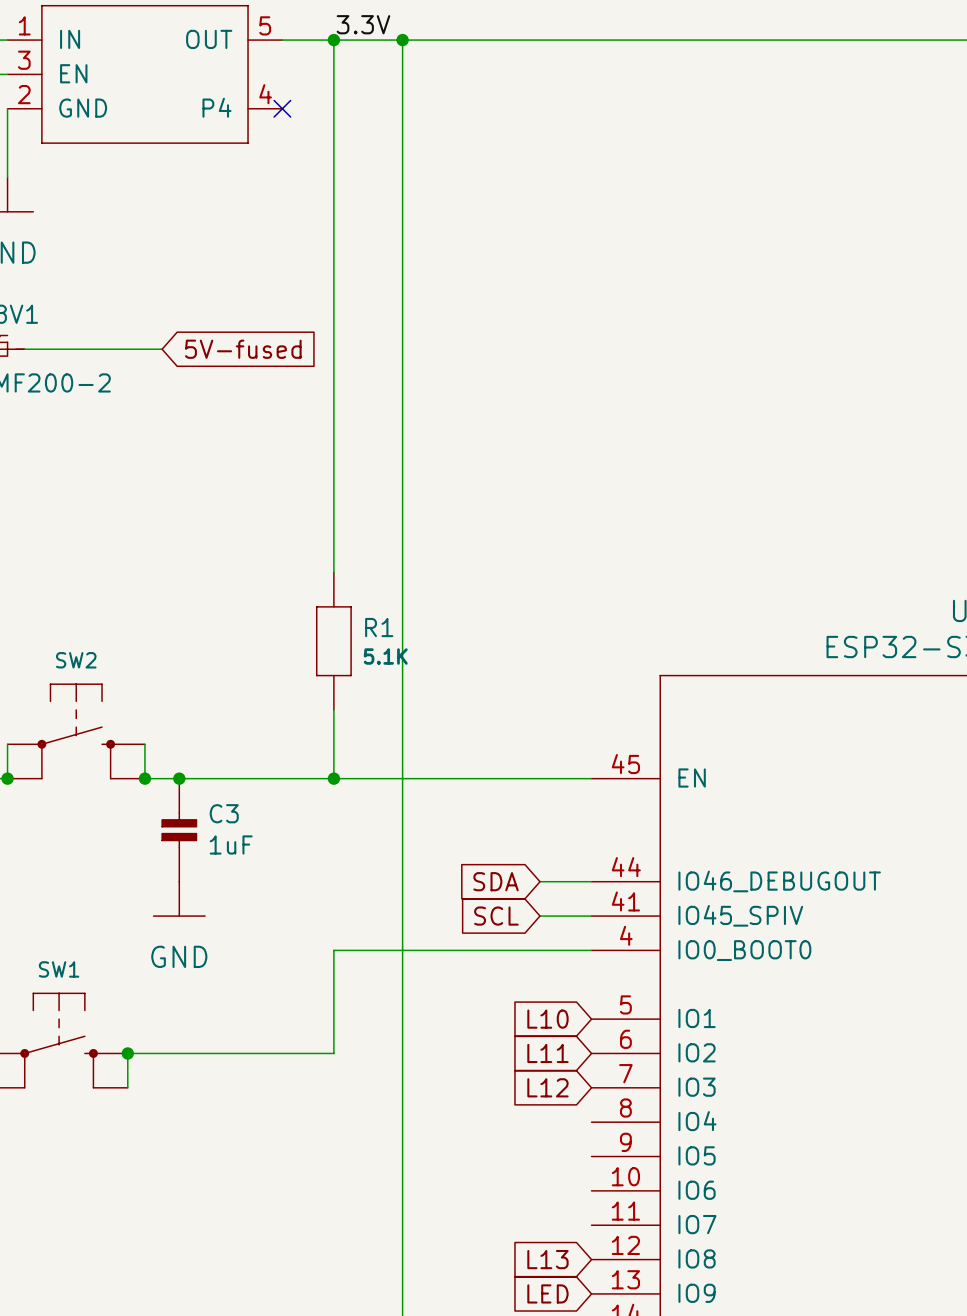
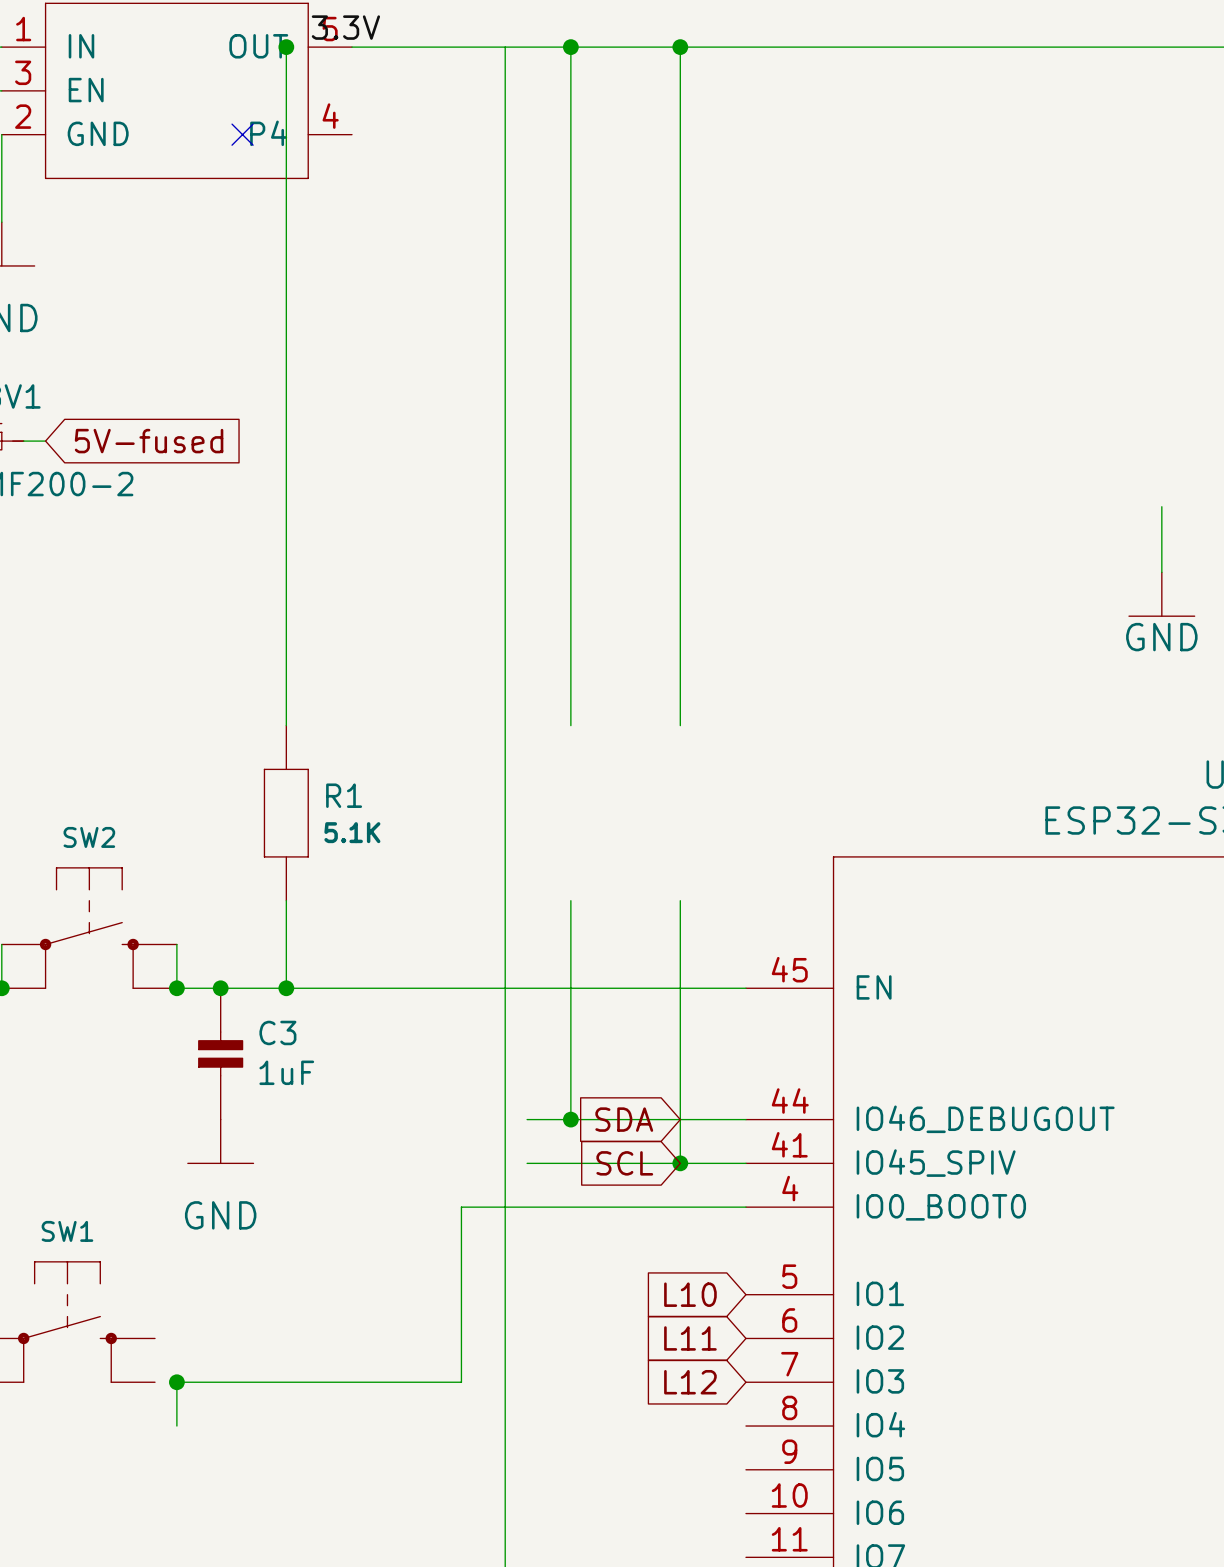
label position: 3.3V (363, 24) -> 3.3V (345, 27)
junction: none -> (286, 47)
wire: (333, 40) (333, 572) -> (286, 47) (286, 725)
junction: (333, 40) -> none
junction position: (402, 40) -> (570, 47)
wire: none -> (570, 47) (570, 725)
wire: none -> (680, 47) (680, 725)
junction: none -> (680, 47)
no-connect mark: none -> (242, 134)
no-connect mark: (282, 108) -> none
wire: (41, 349) (162, 349) -> none
global label position: 5V-fused (243, 349) -> 5V-fused (149, 441)
wire: none -> (1161, 506) (1161, 572)
power symbol: none -> GND (1161, 594)
R1 position: (333, 641) -> (286, 813)
wire: (333, 709) (333, 778) -> (286, 900) (286, 988)
wire: none -> (570, 900) (570, 1119)
wire: none -> (680, 900) (680, 1163) (527, 1163)
junction: none -> (286, 988)
junction: (333, 778) -> none
wire: none -> (527, 1119) (680, 1119)
junction: none -> (570, 1119)
junction: none -> (680, 1163)
wire: (368, 950) (333, 950) (333, 1053) (127, 1053) (127, 1087) -> (461, 1207) (461, 1382) (176, 1382) (176, 1426)
junction position: (127, 1053) -> (176, 1382)

